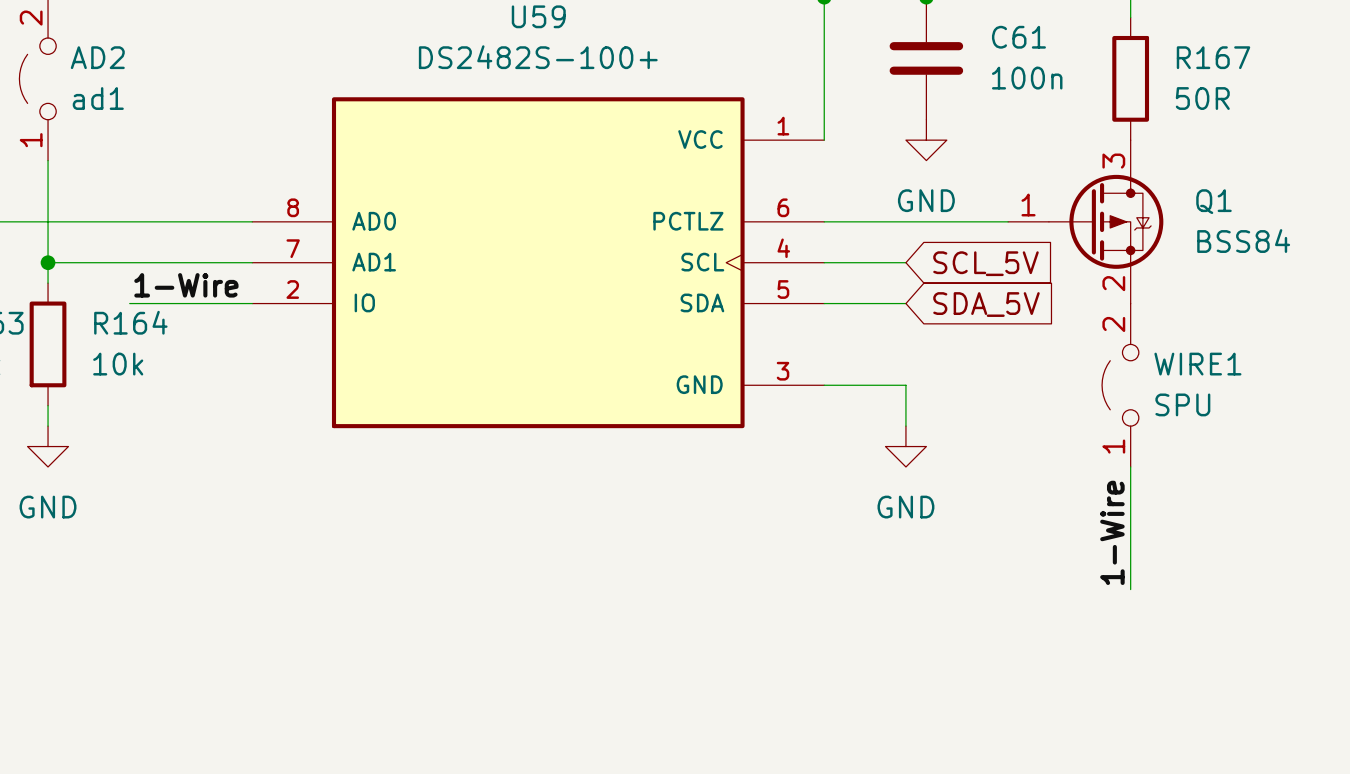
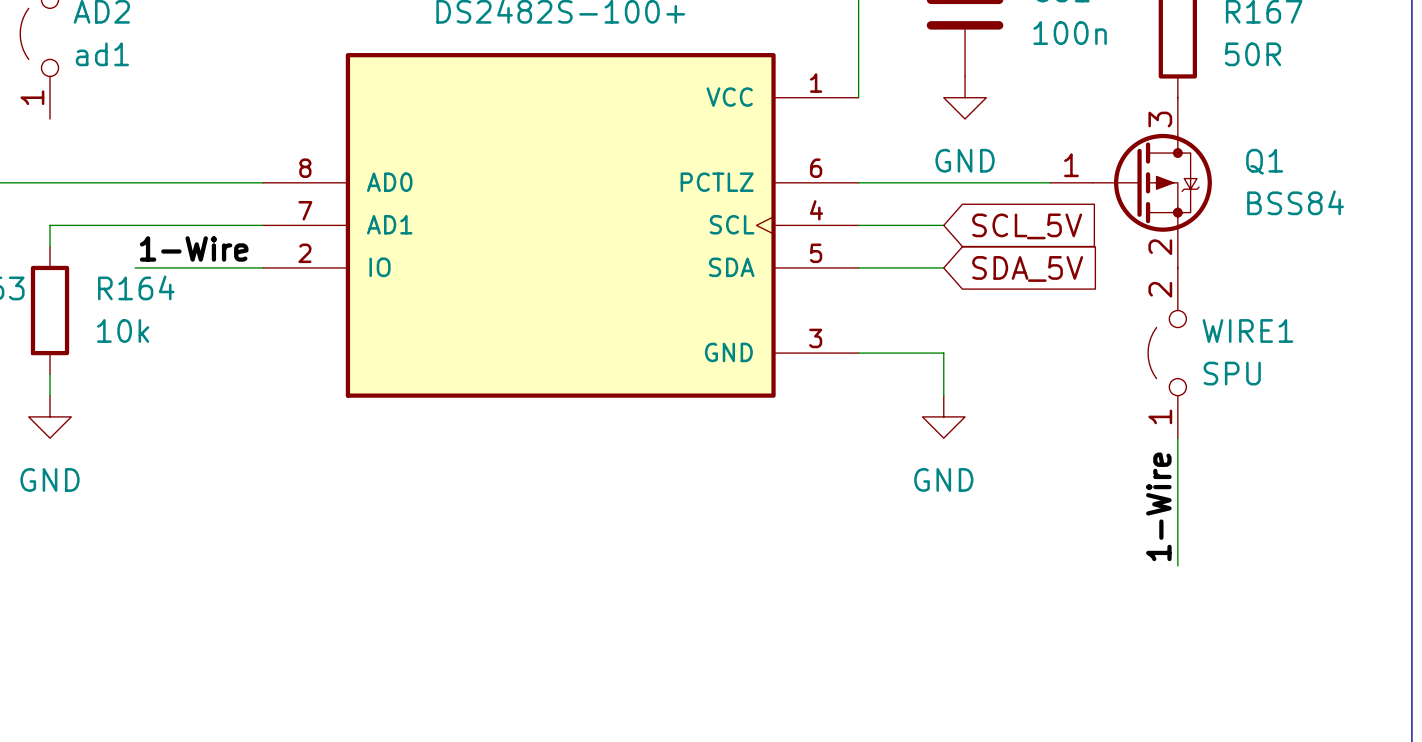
wire: (48, 160) (48, 262) -> none
junction: (48, 262) -> none

